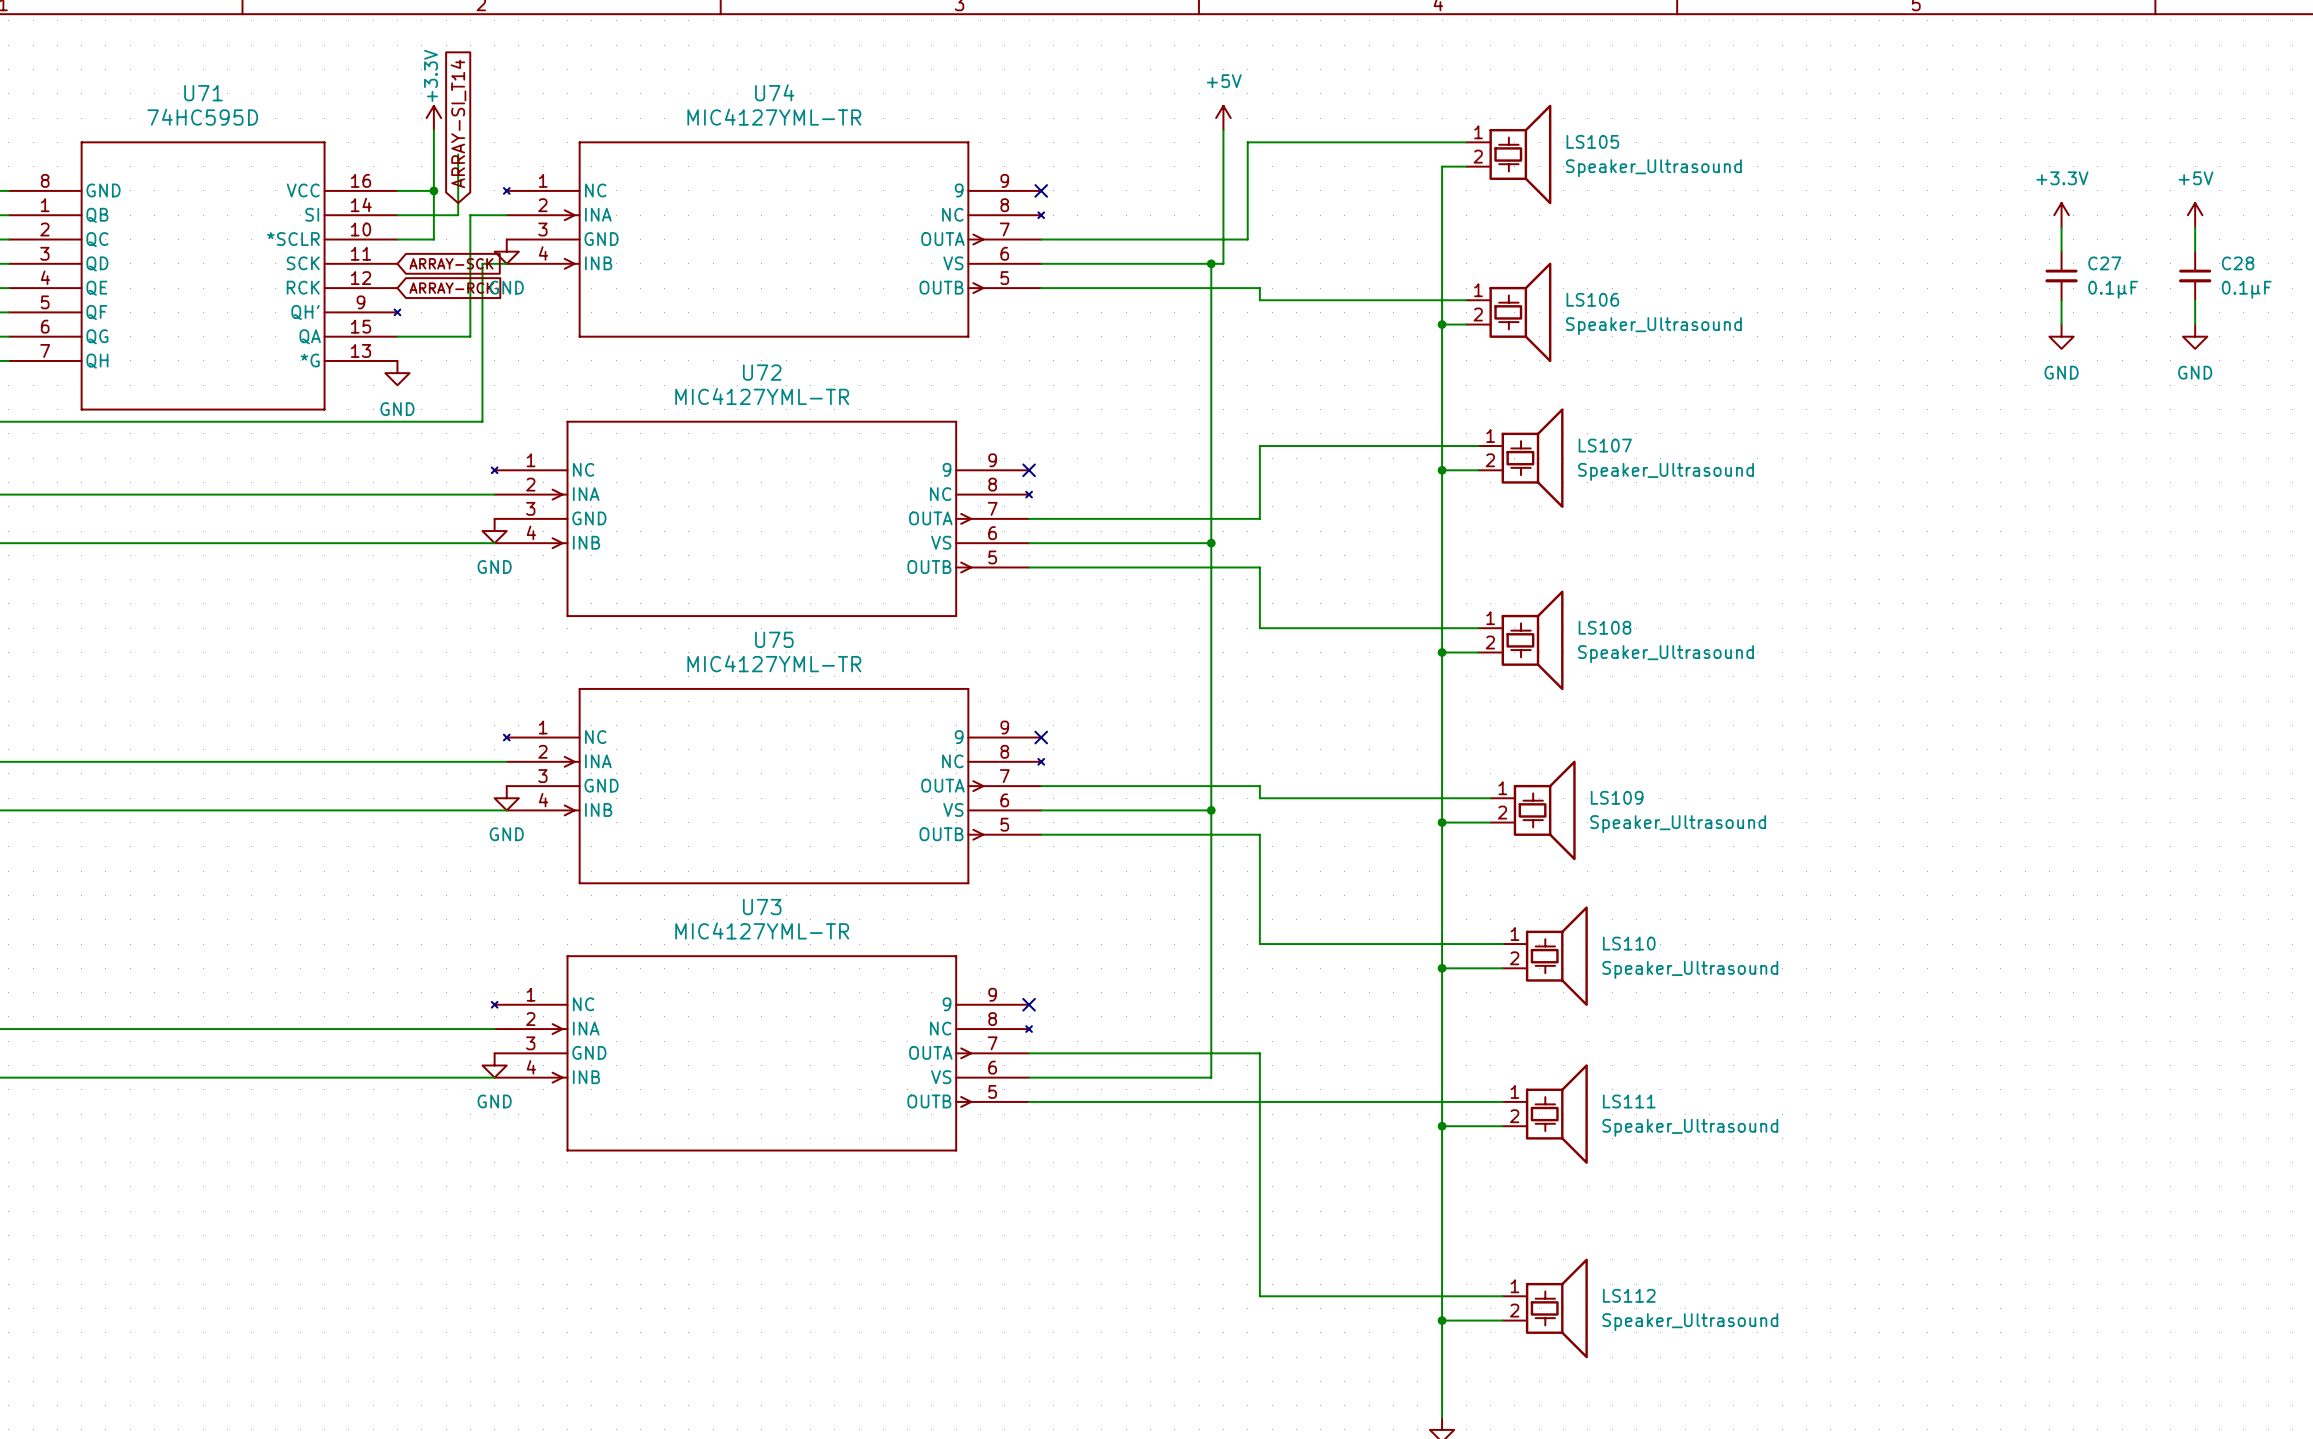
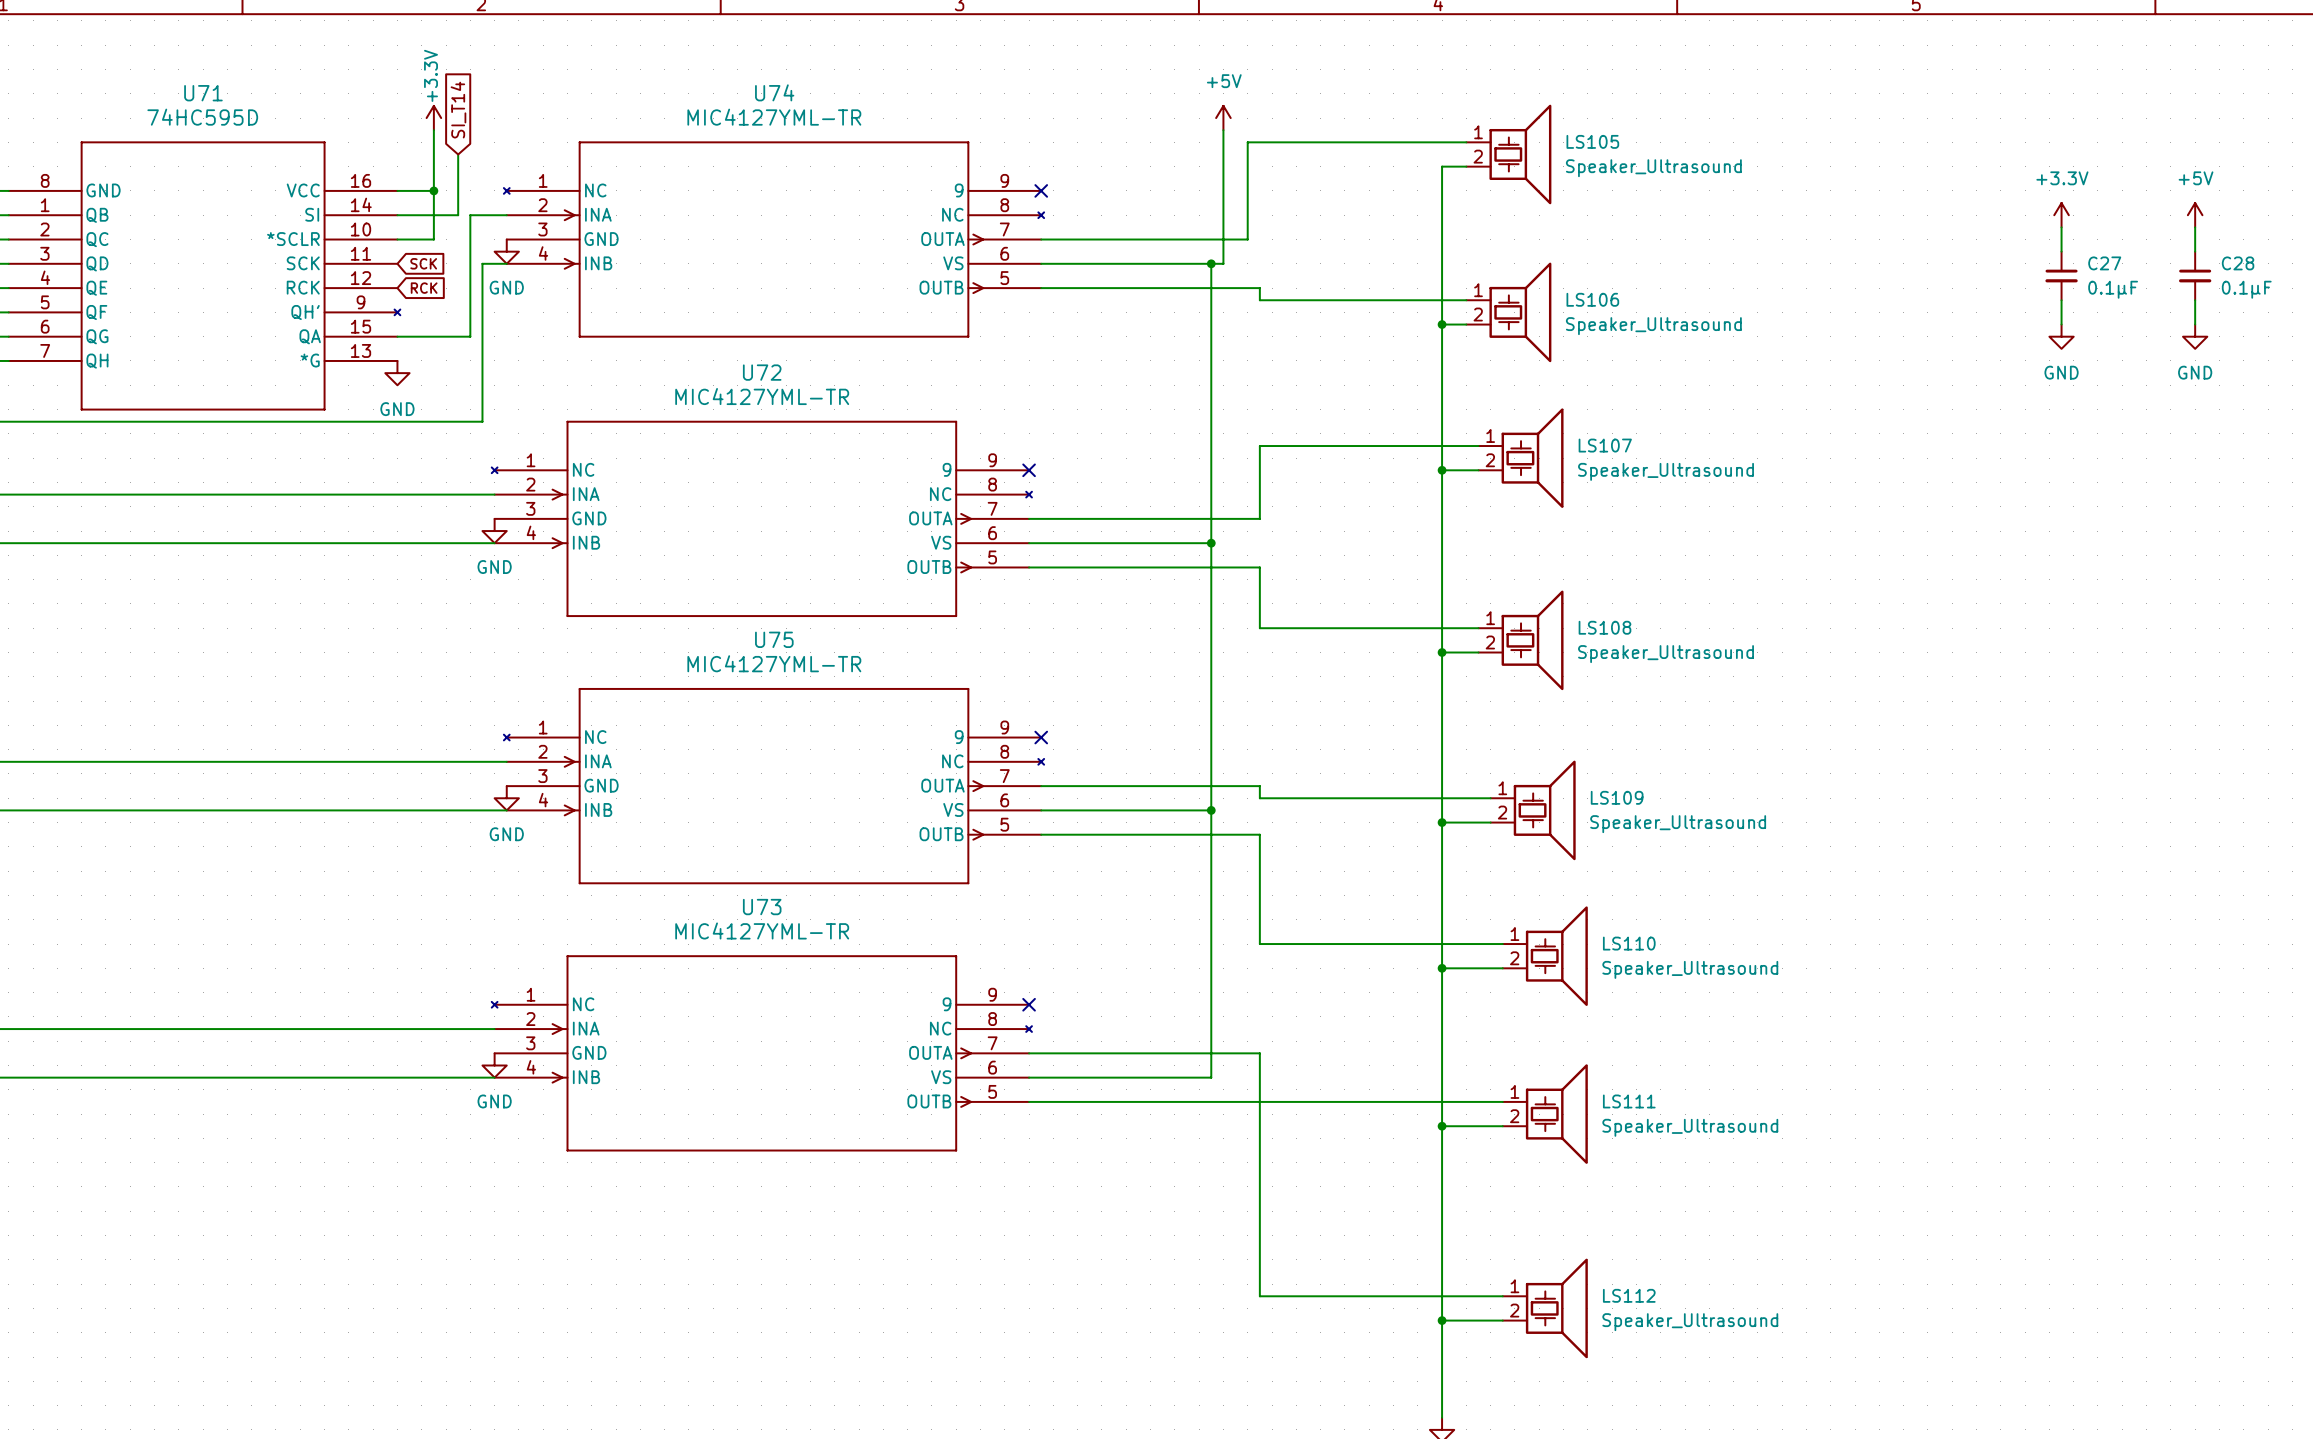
global label: ARRAY-SI_T14 (458, 123) -> SI_T14 (458, 110)
global label: ARRAY-SCK (451, 263) -> SCK (423, 263)
global label: ARRAY-RCK (451, 288) -> RCK (424, 288)

